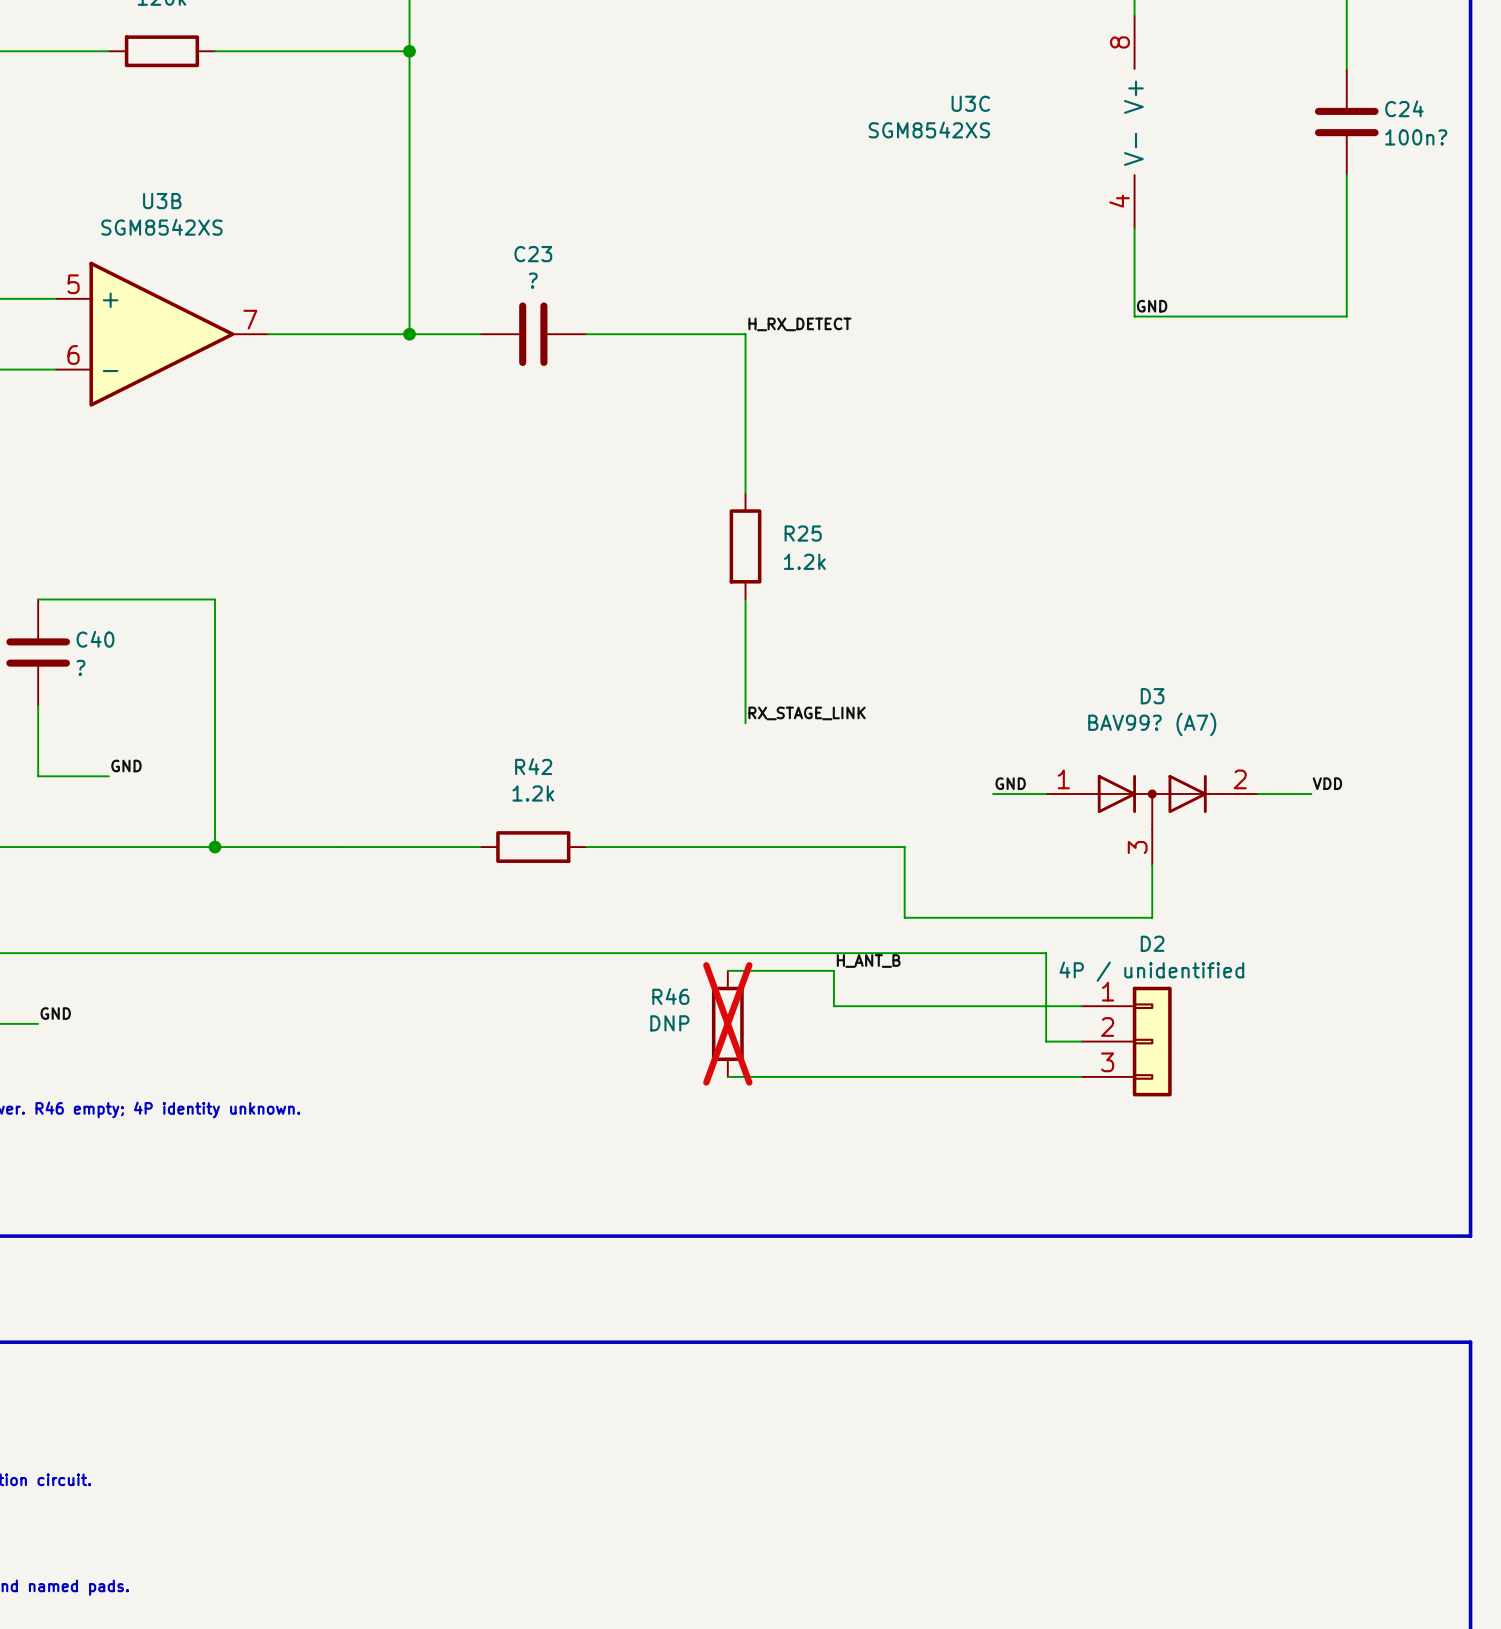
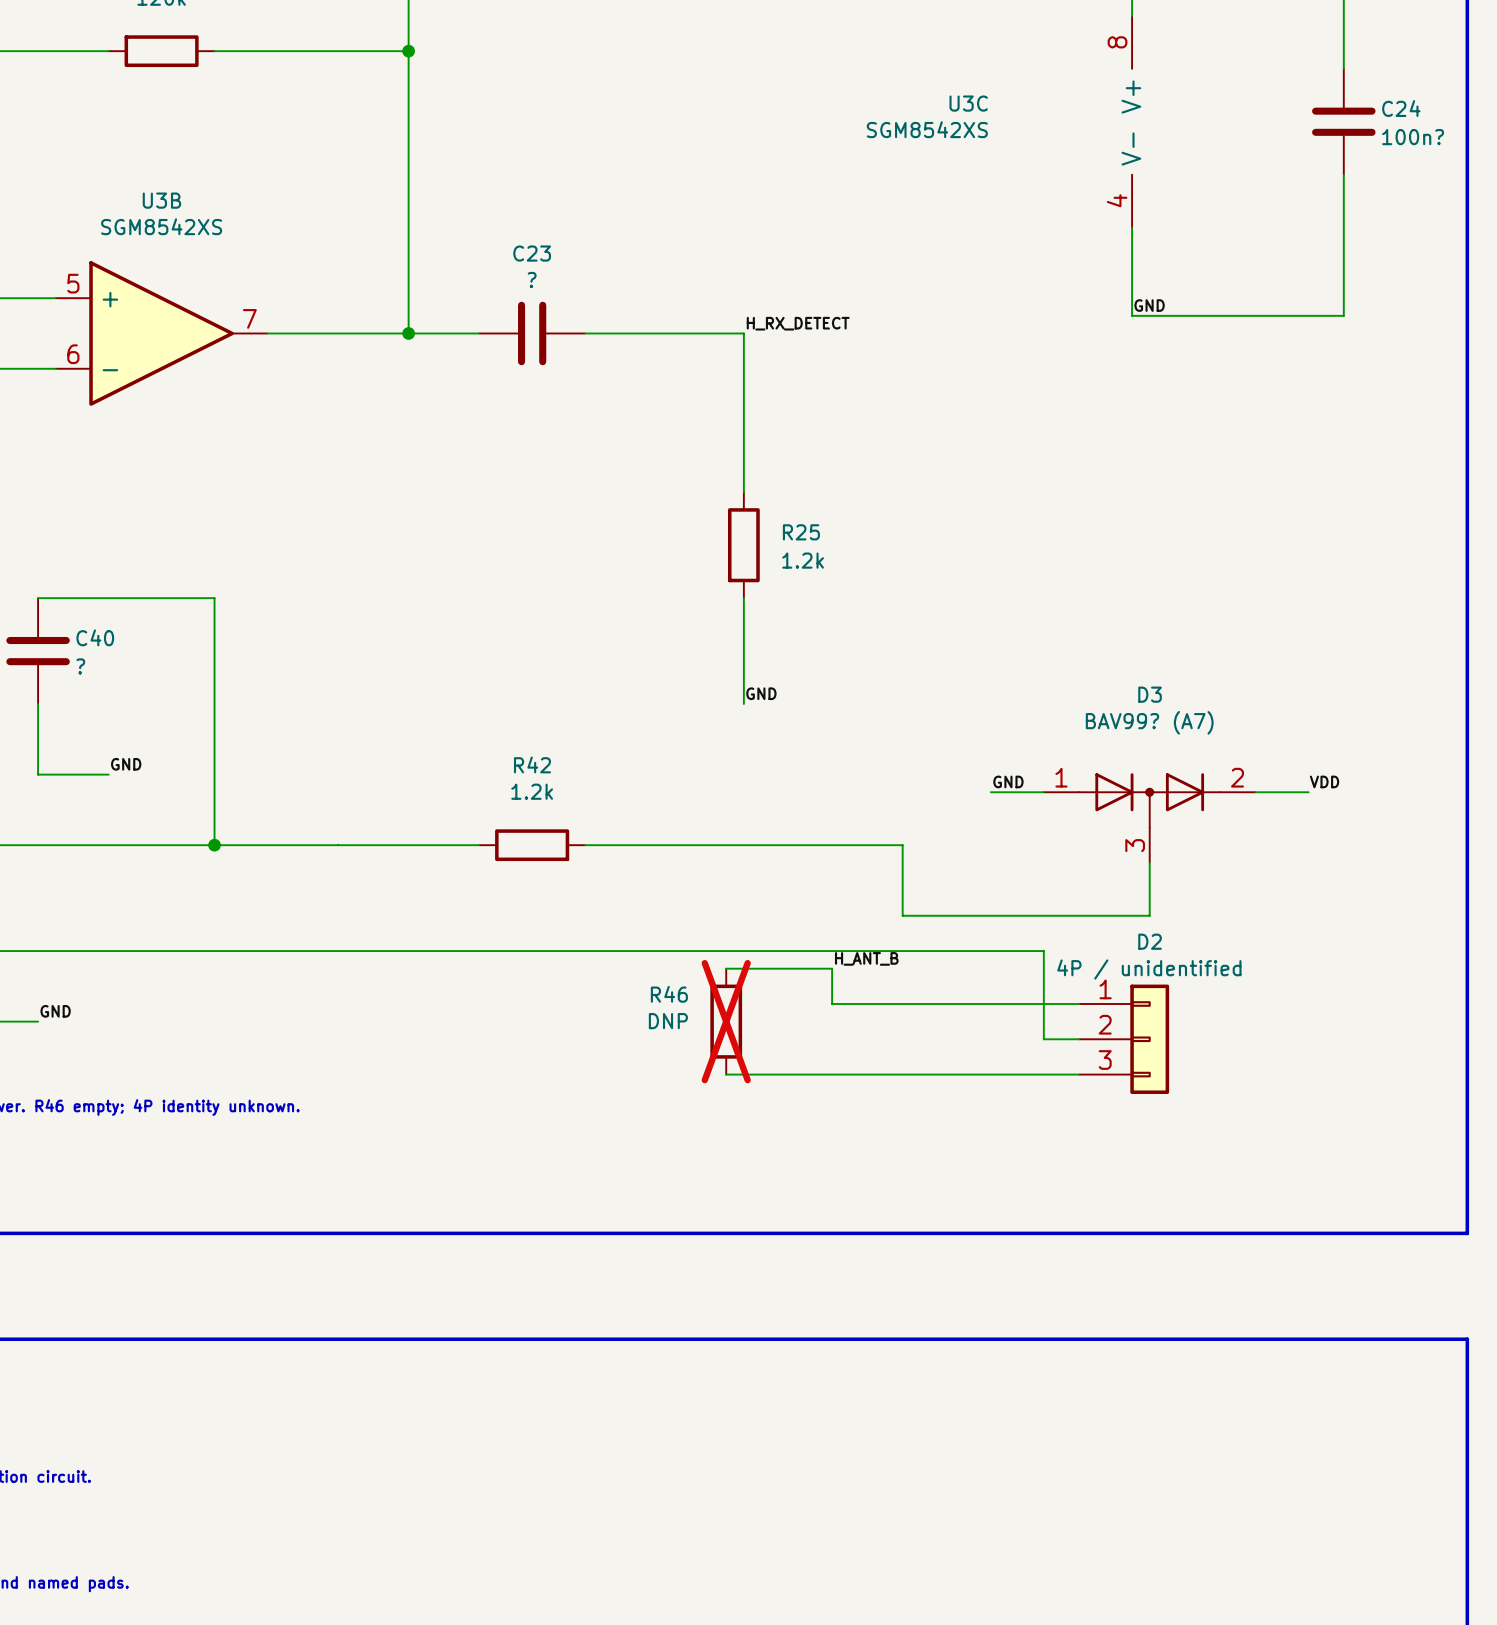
label: none -> GND (761, 693)
wire: (745, 705) (745, 723) -> none
label: RX_STAGE_LINK (807, 713) -> none

